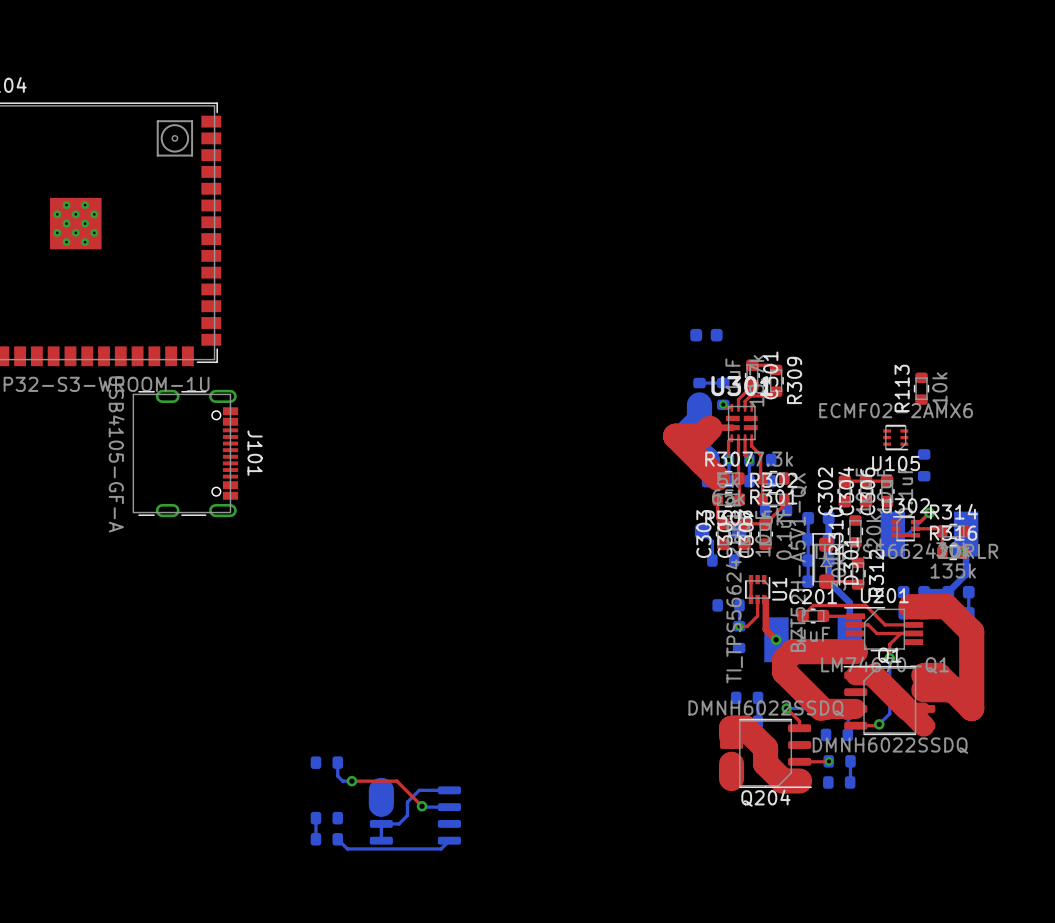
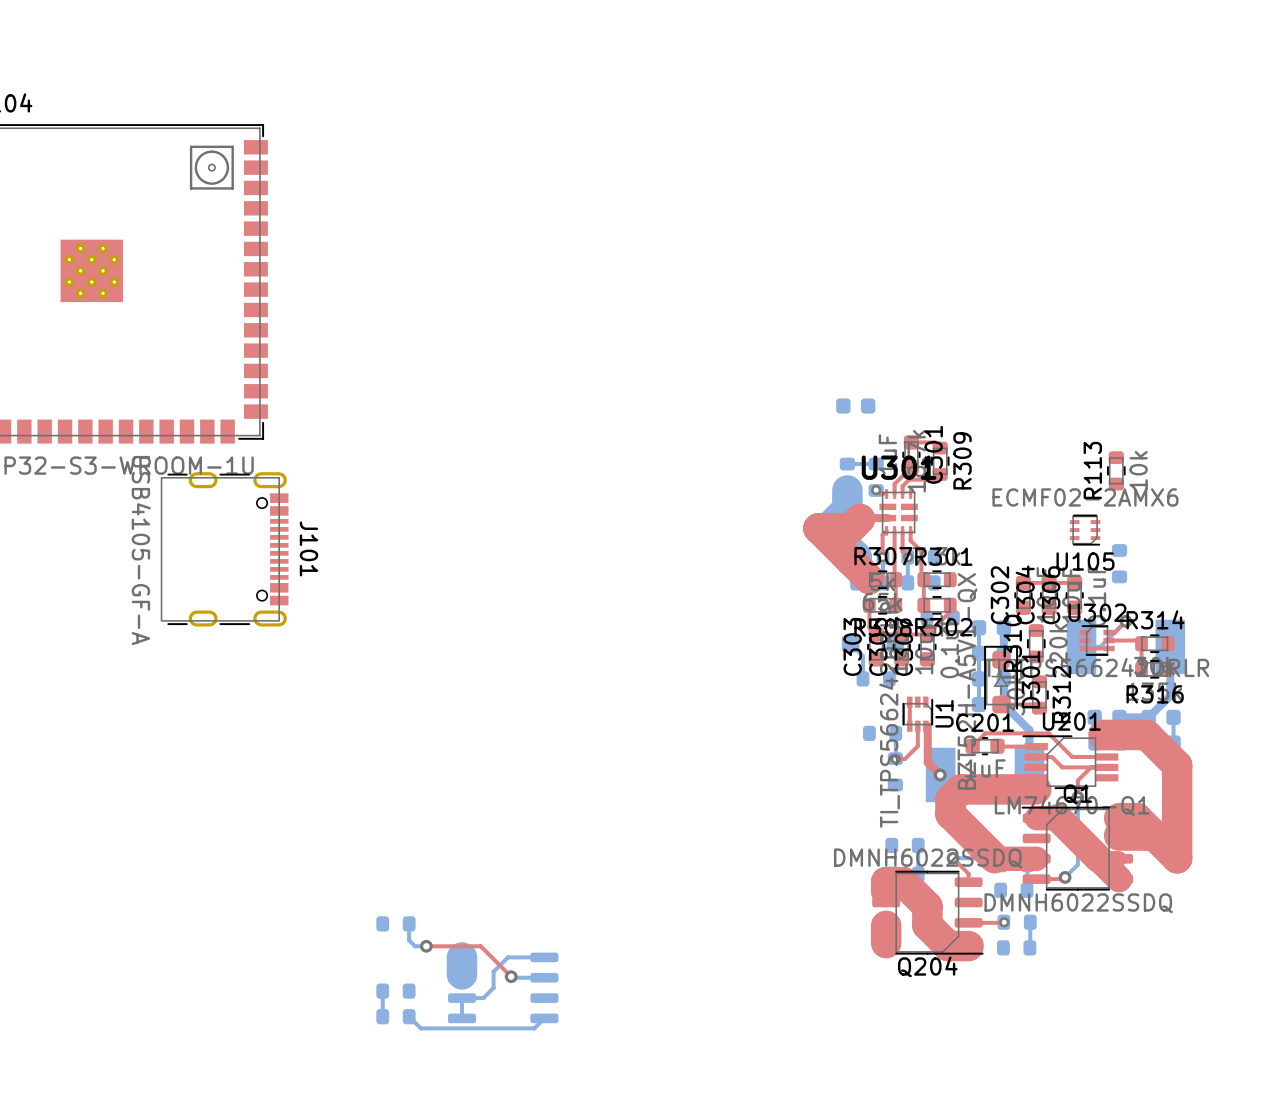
R302 name position: R302 (773, 480) -> R302 (943, 627)
R301 name position: R301 (773, 496) -> R301 (943, 556)
R316 name position: R316 (953, 533) -> R316 (1155, 694)

